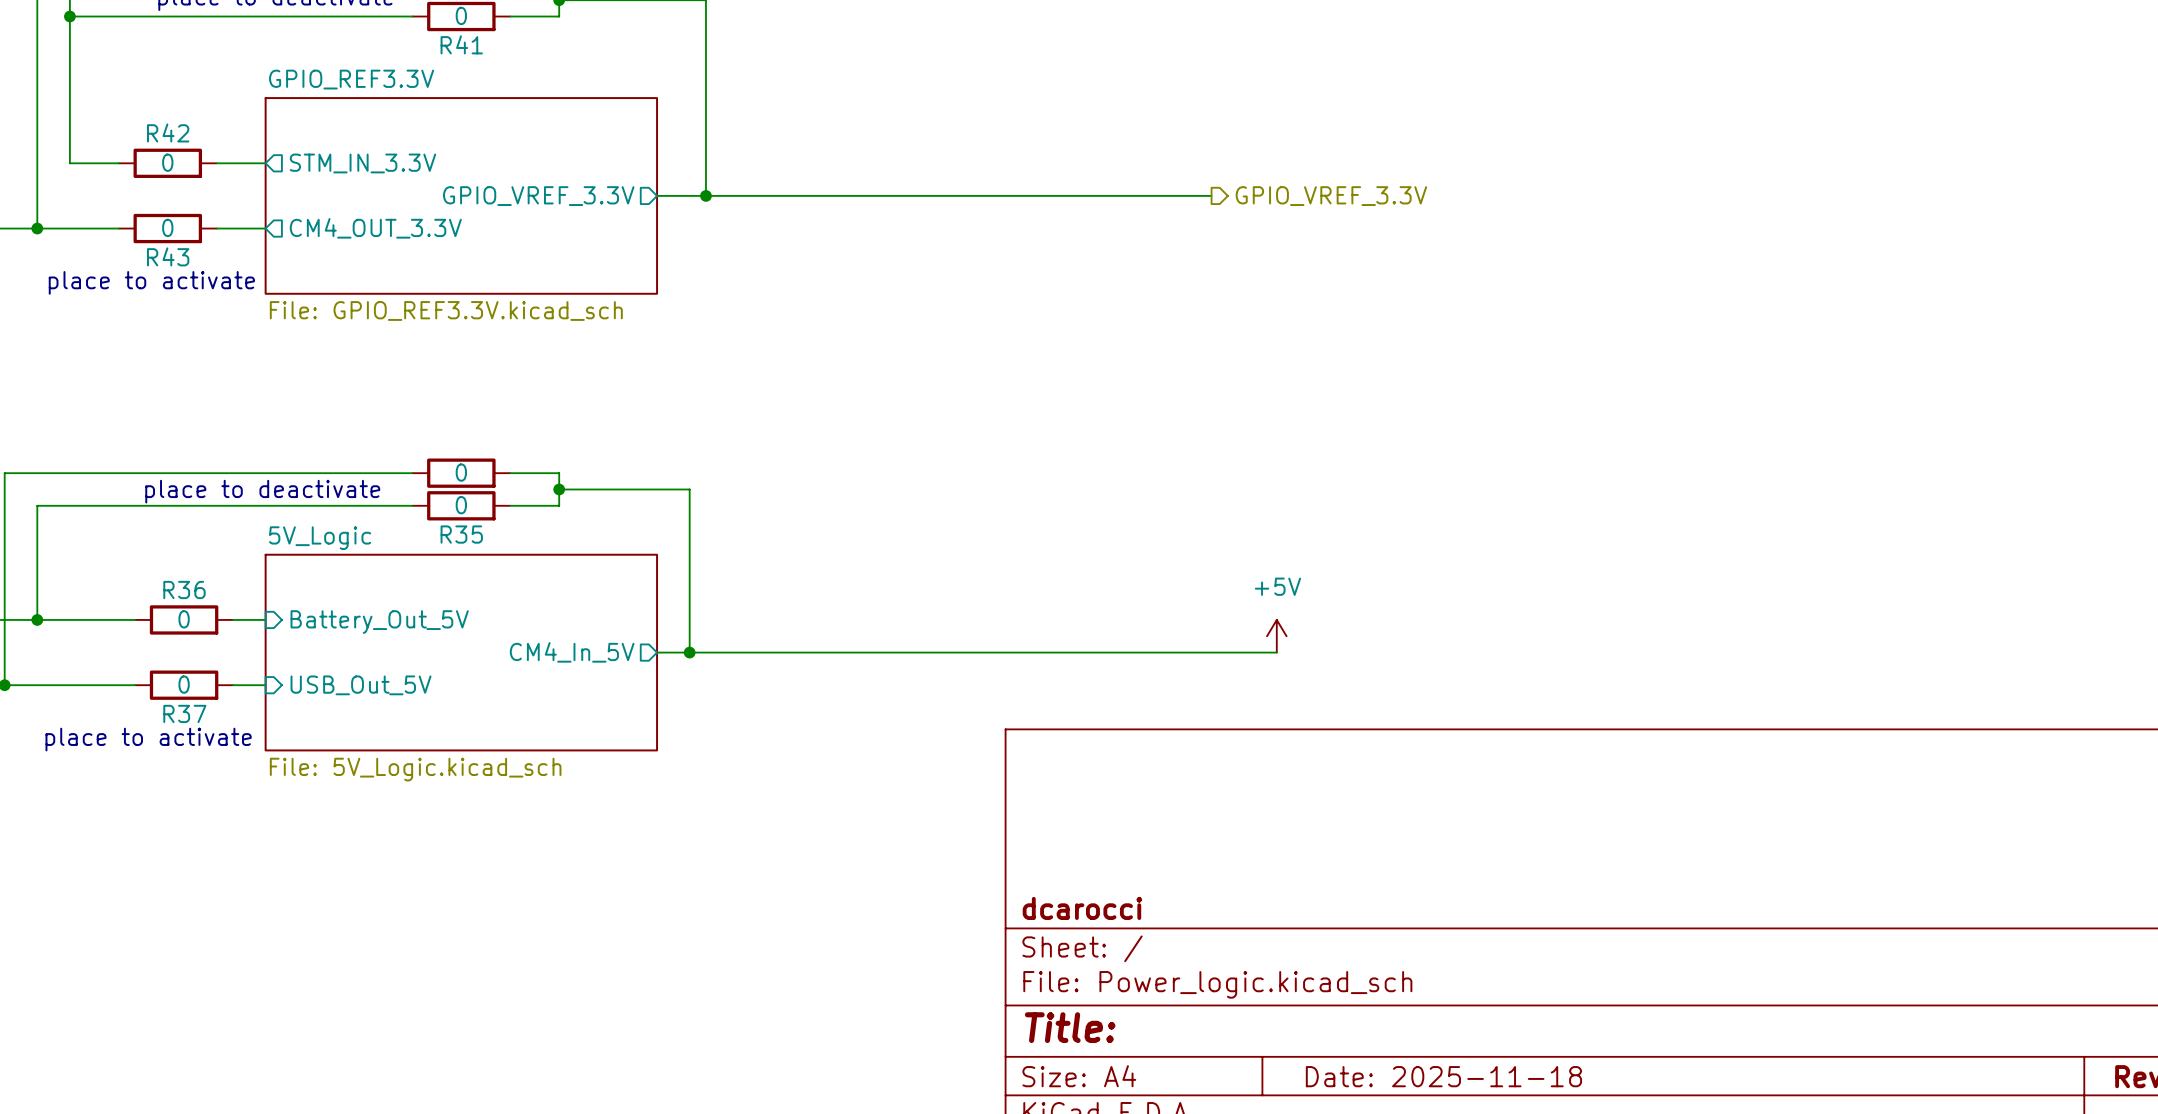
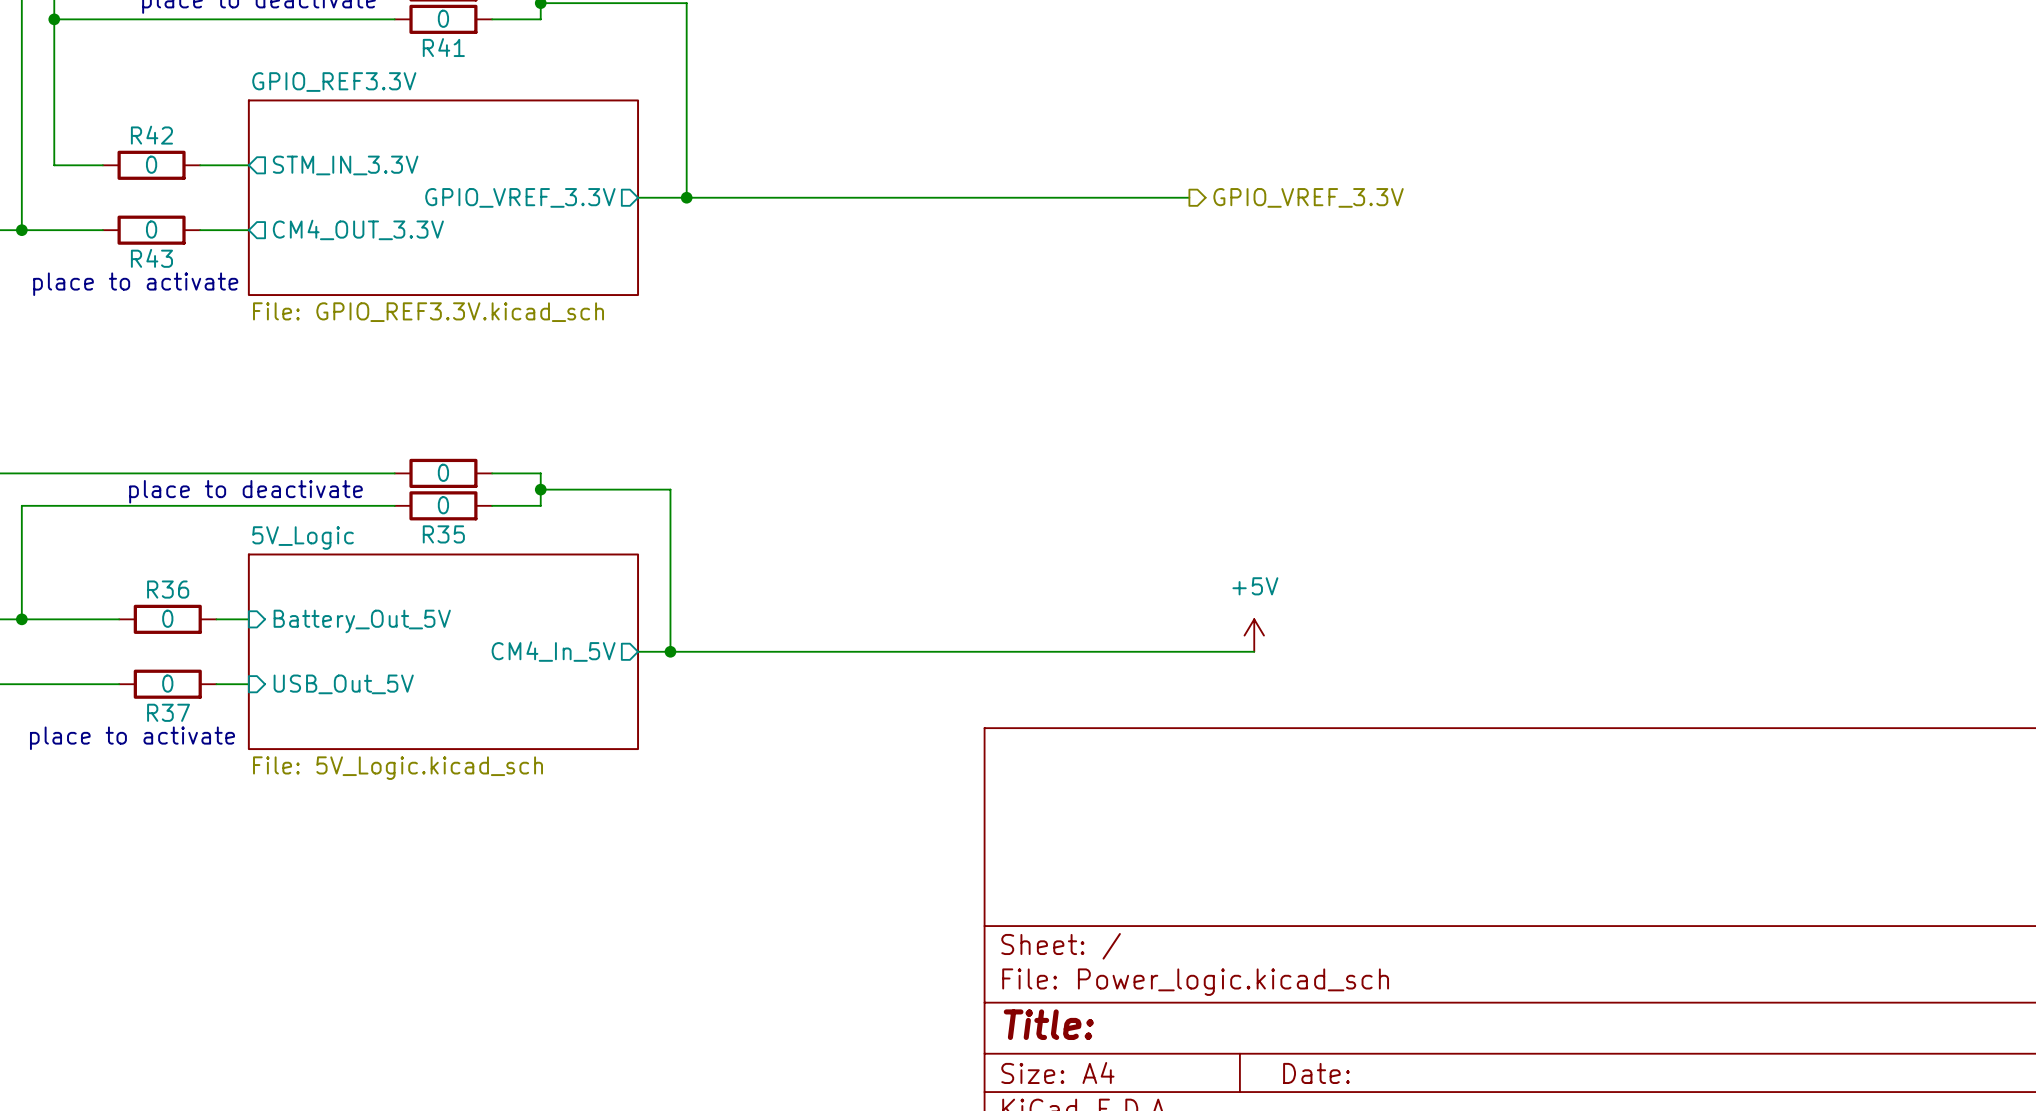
title block: dcarocci (1082, 908) -> none
title block: Date: 2025-11-18 (1443, 1076) -> Date: (1316, 1073)

